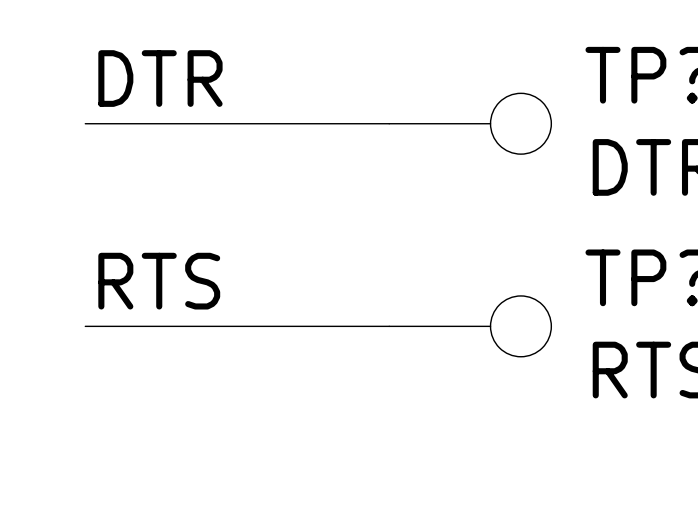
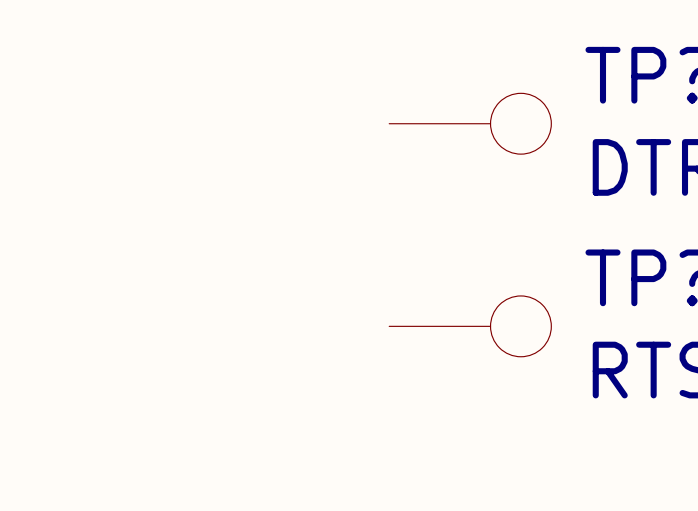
label: DTR (160, 78) -> none
wire: (85, 123) (389, 123) -> none
label: RTS (159, 281) -> none
wire: (85, 326) (389, 326) -> none

